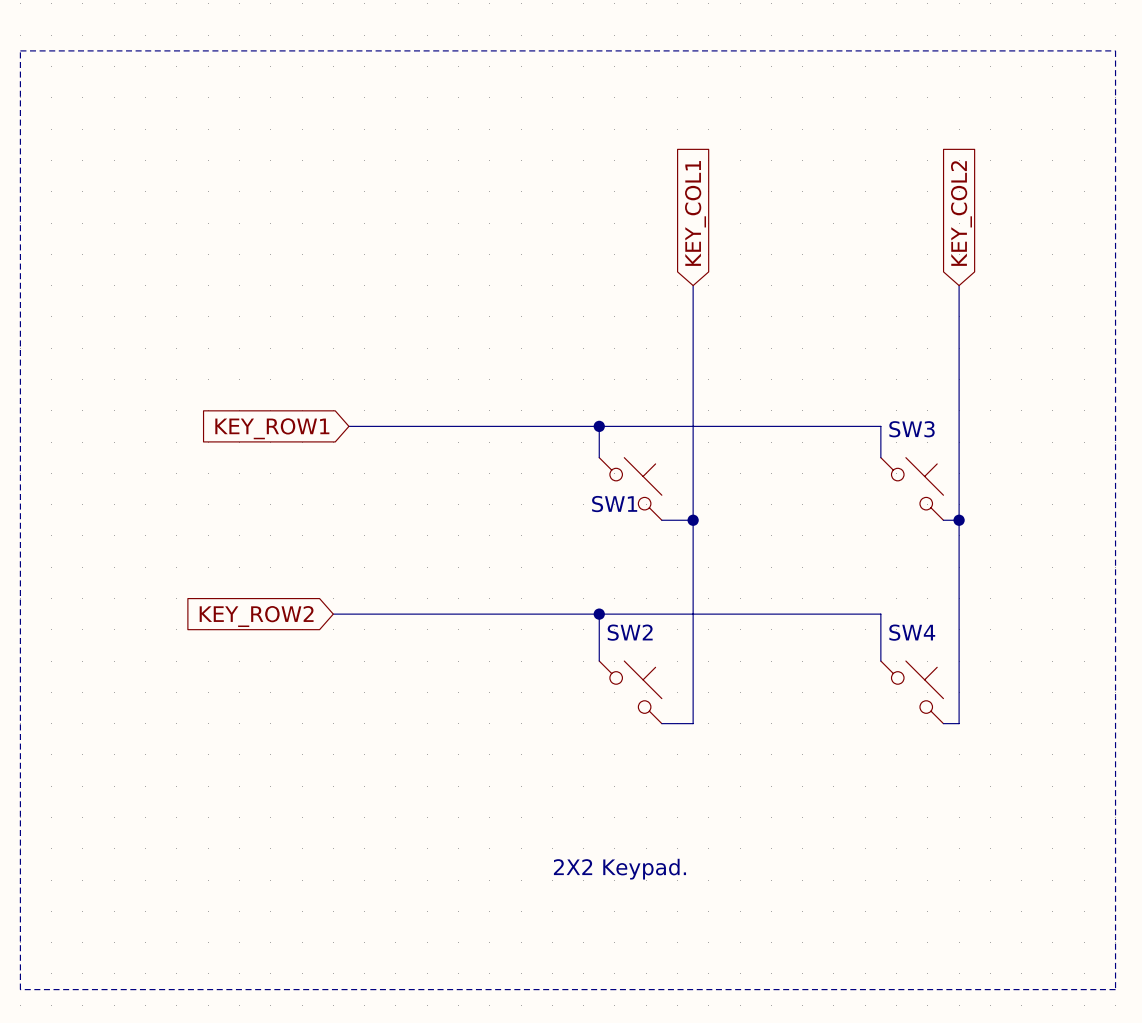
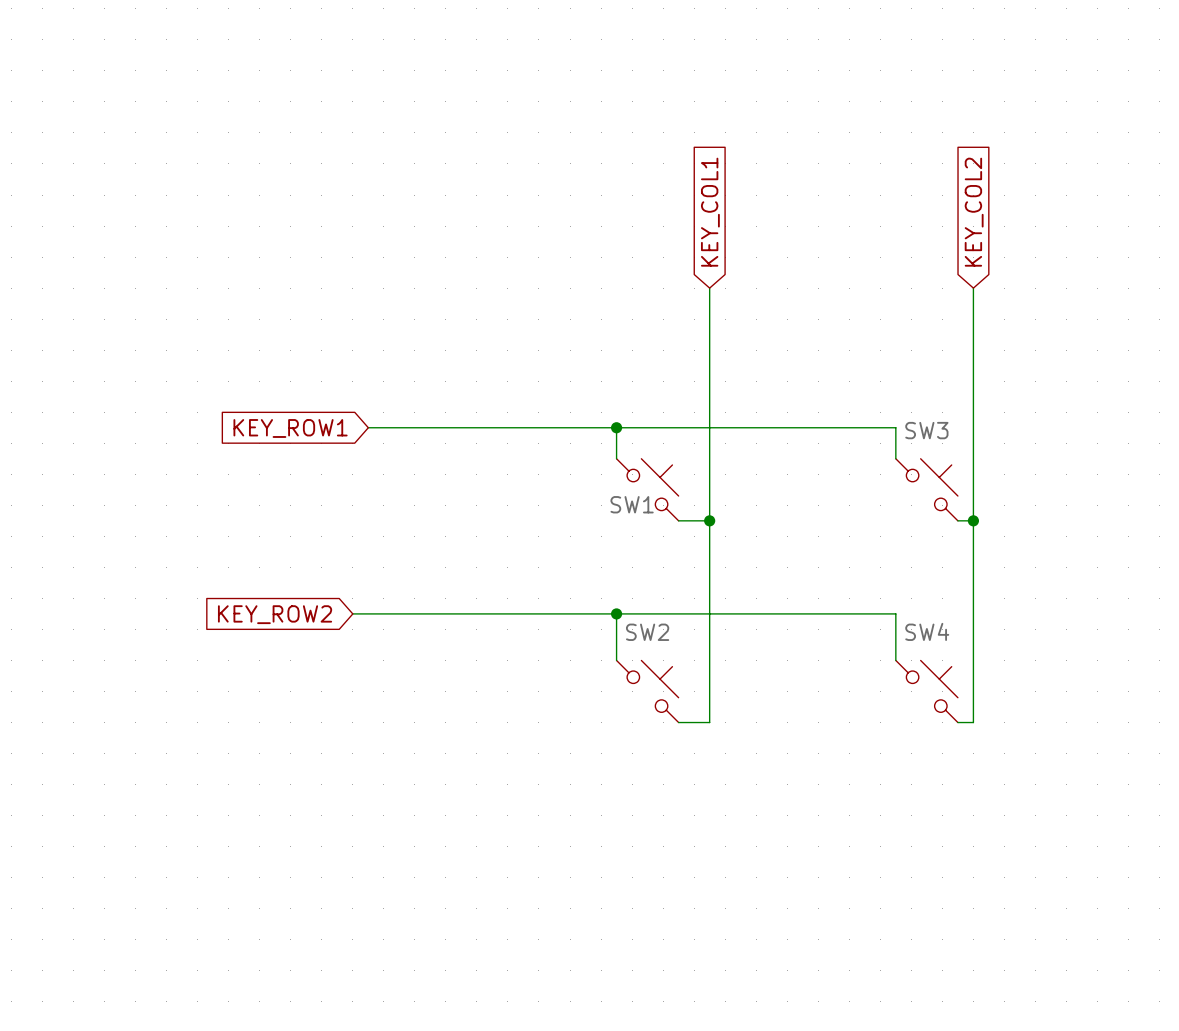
line: (20, 50) (20, 989) (1115, 989) (1115, 50) (20, 50) -> none
text: 2X2 Keypad. (619, 869) -> none

